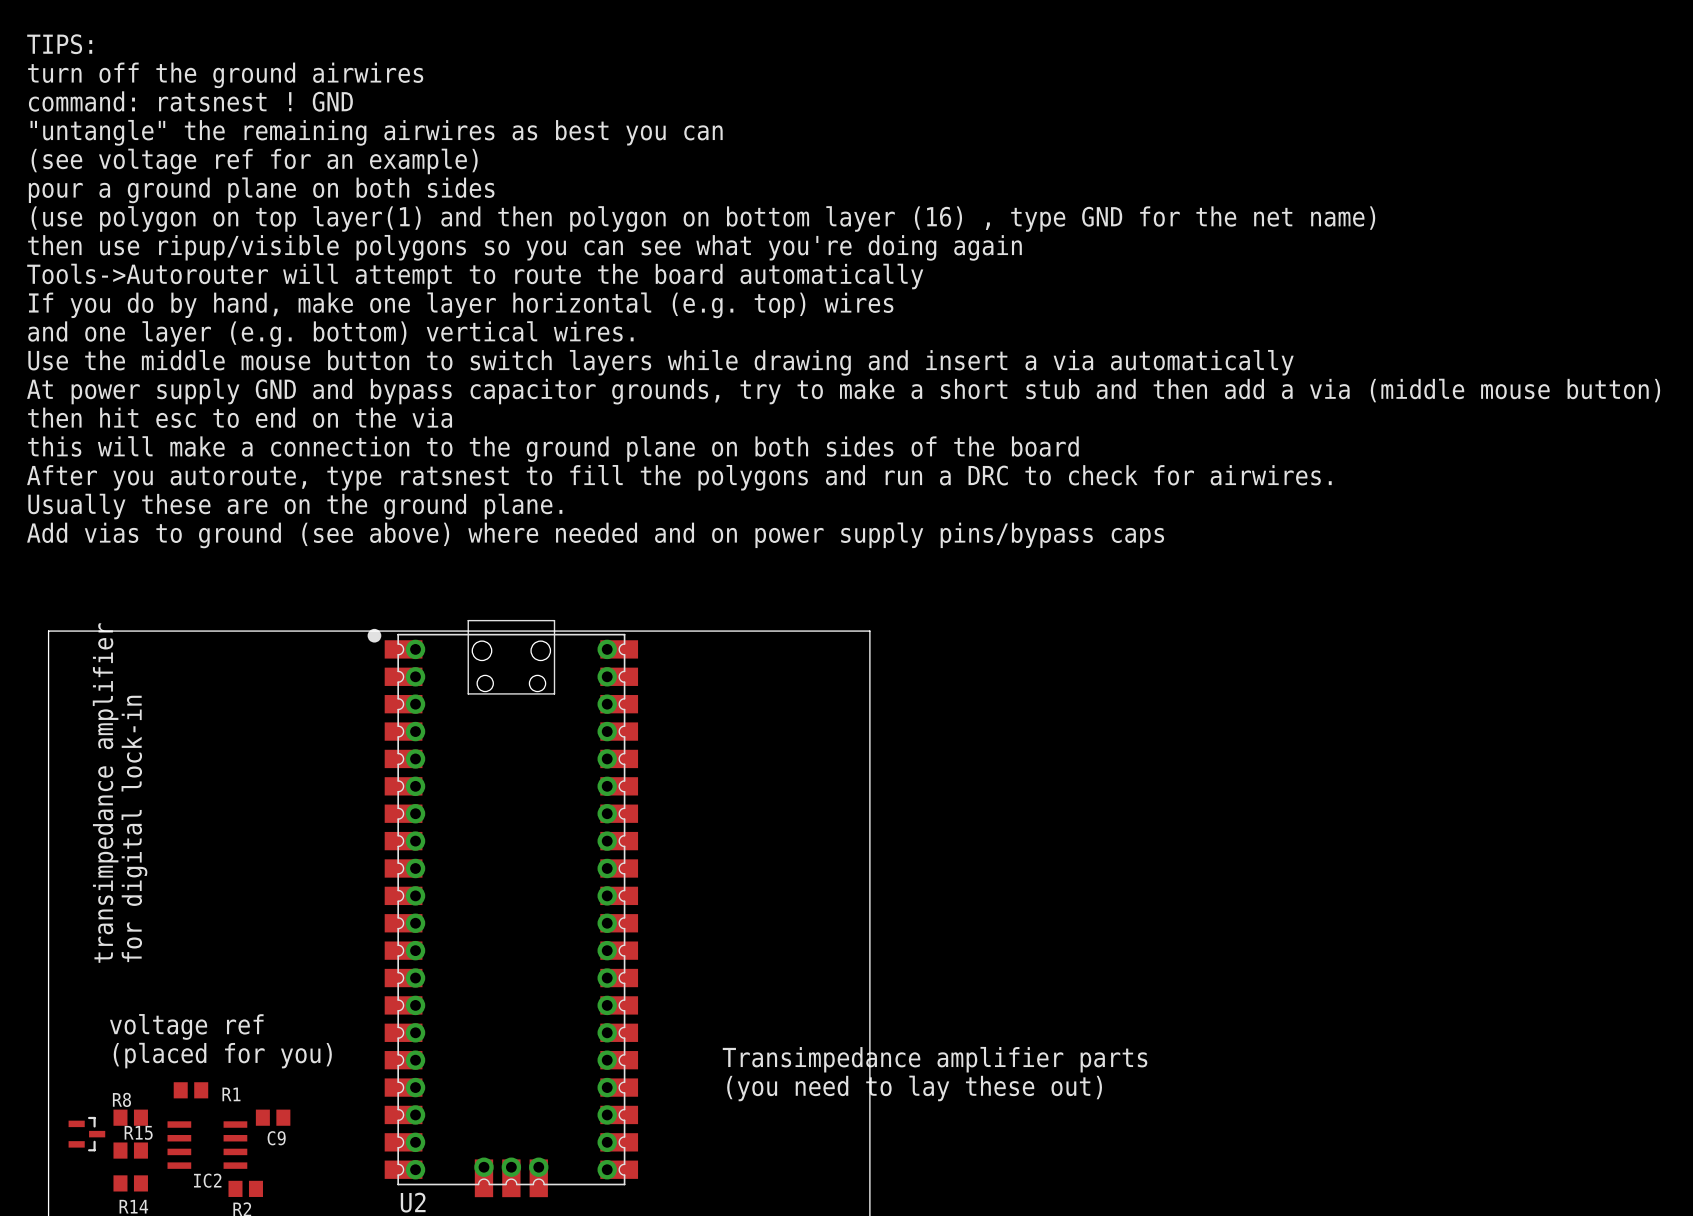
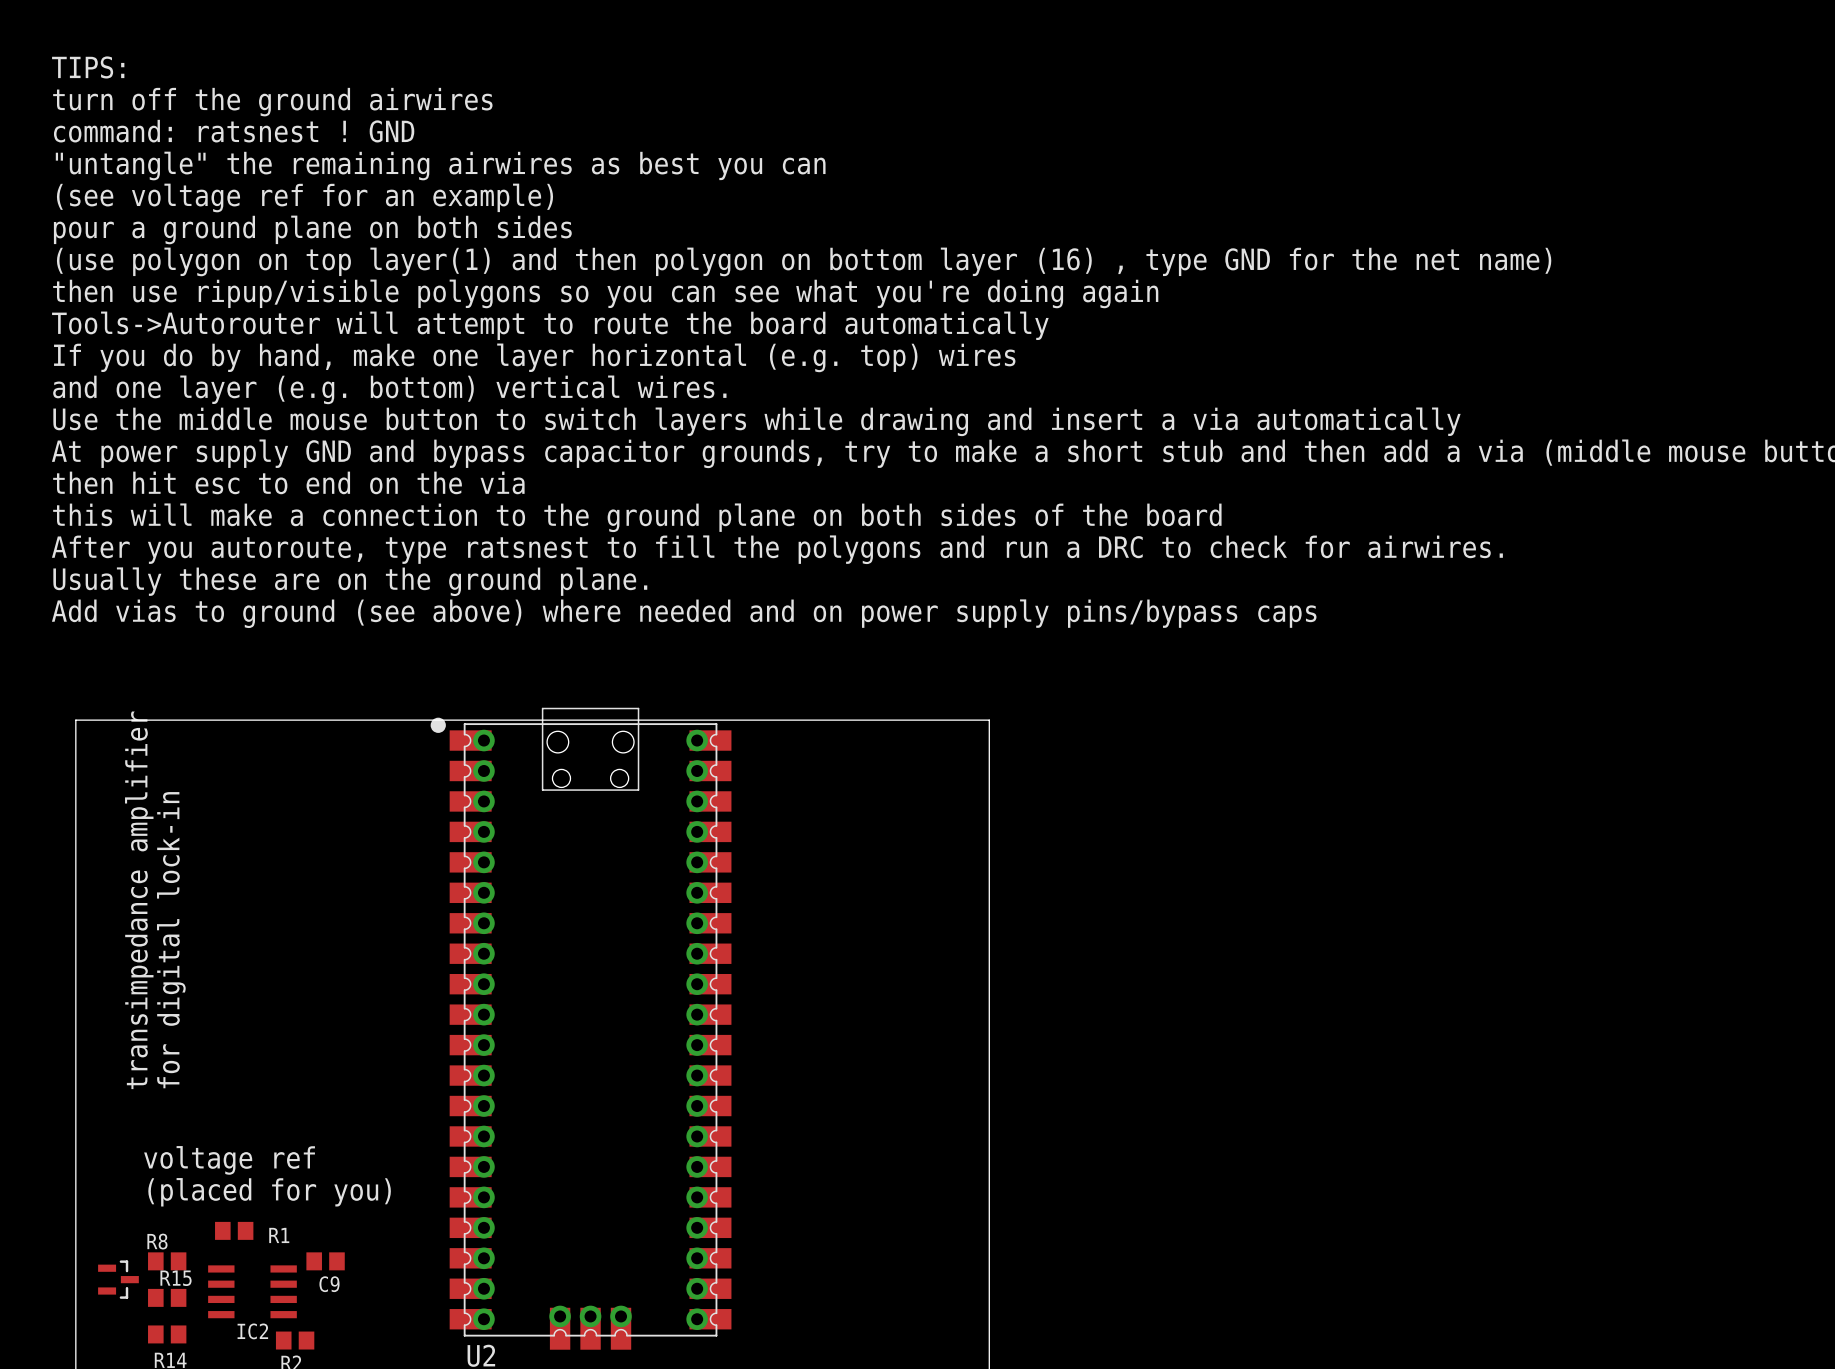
text: Transimpedance amplifier parts (935, 1059) -> none
text: (you need to lay these out) (914, 1088) -> none

